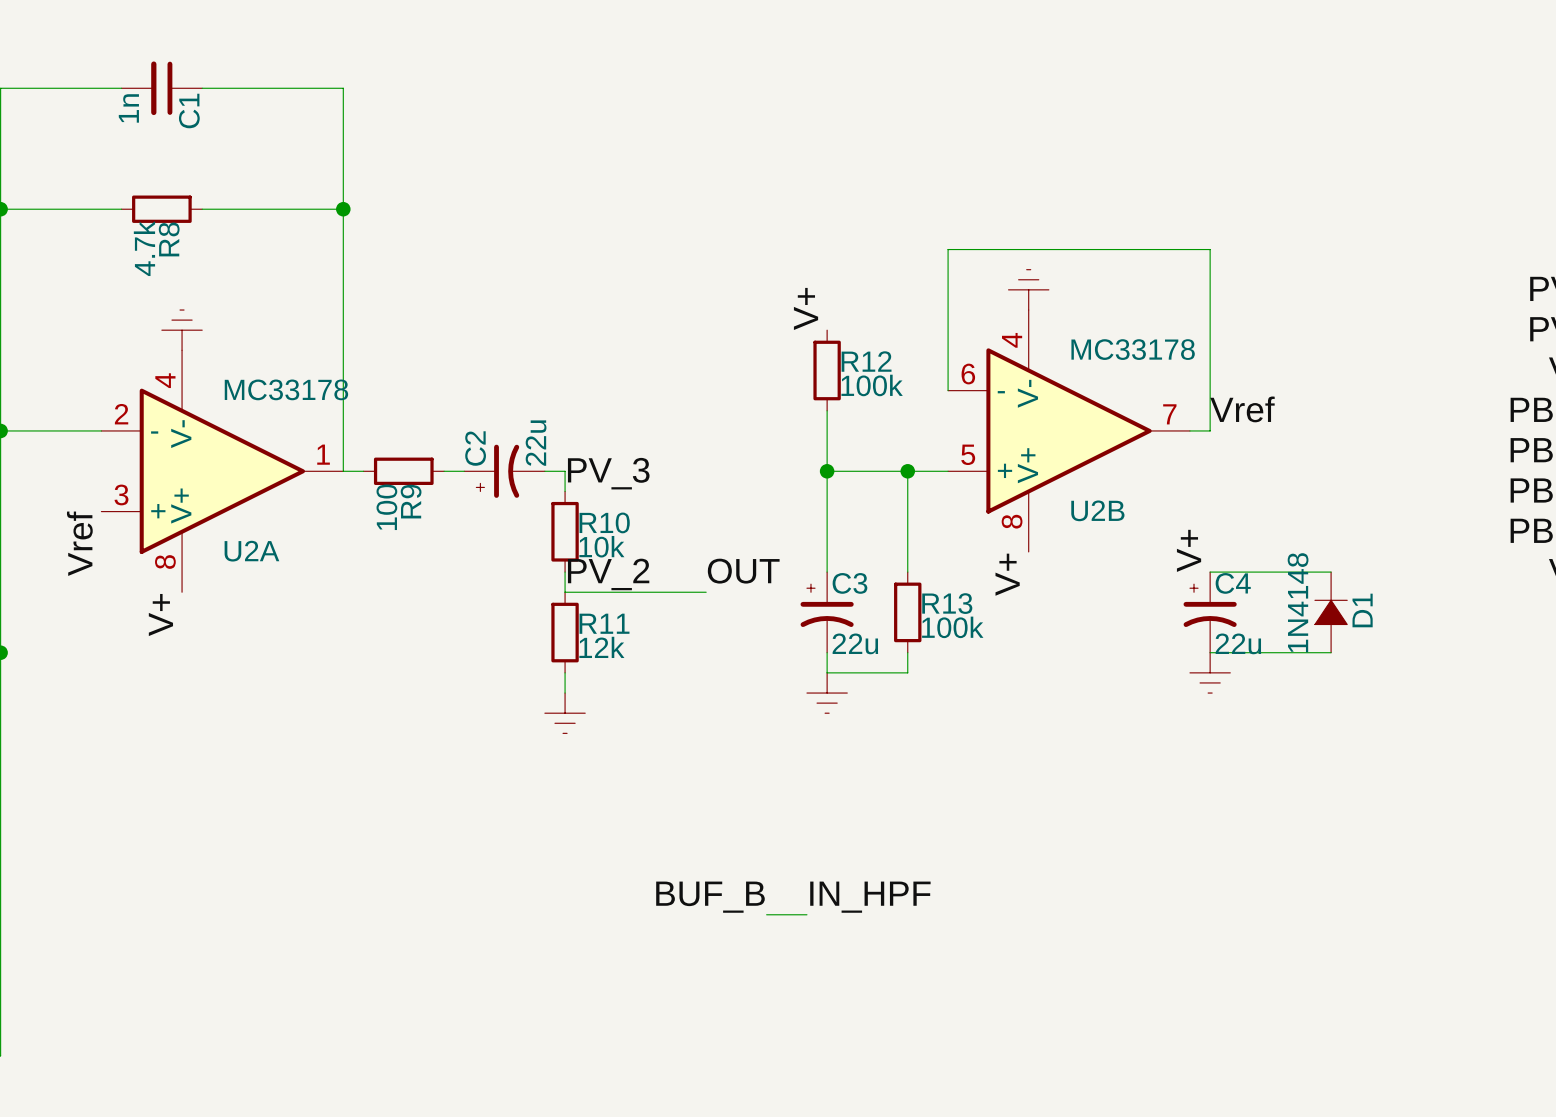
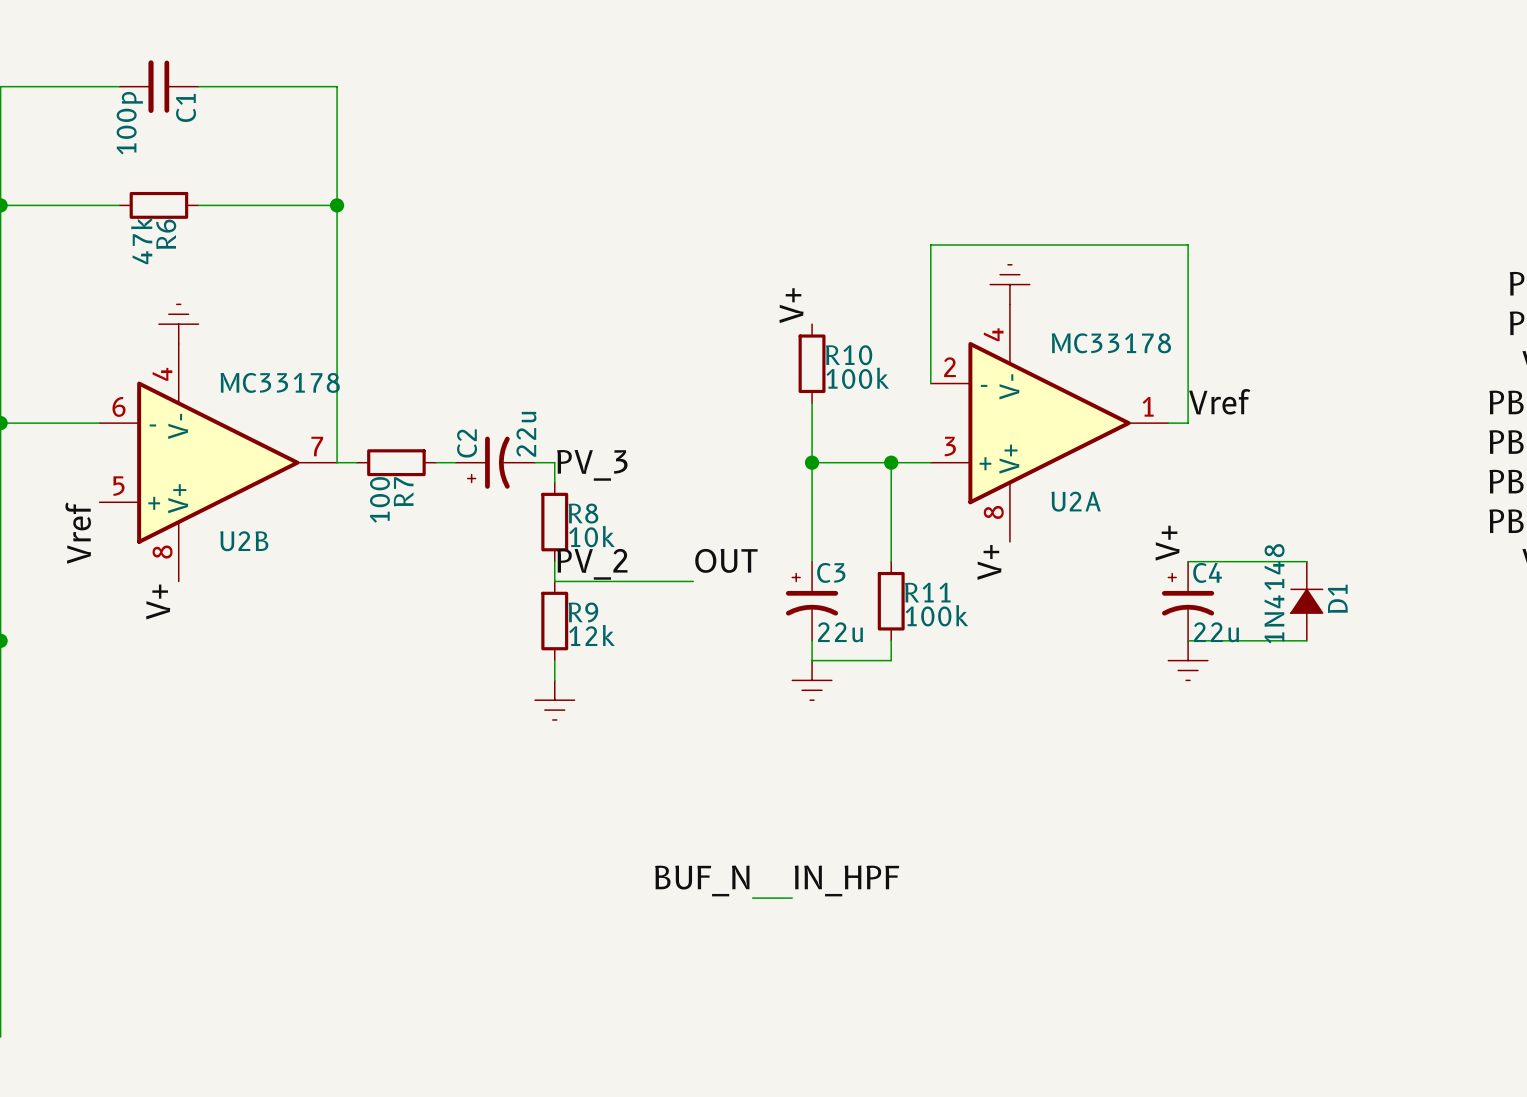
C1 value: 1n (128, 108) -> 100p (129, 123)
R8 name: R8 (169, 239) -> R6 (166, 234)
R8 value: 4.7k (144, 248) -> 47k (141, 240)
R12 name: R12 (866, 361) -> R10 (849, 355)
U2B position: (1069, 430) -> (218, 462)
U2A position: (222, 471) -> (1049, 423)
R9 name: R9 (411, 501) -> R7 (403, 491)
R10 name: R10 (604, 522) -> R8 (583, 513)
R13 name: R13 (947, 603) -> R11 (927, 592)
R11 name: R11 (604, 623) -> R9 (583, 612)
label: BUF_B (710, 897) -> BUF_N (702, 880)

